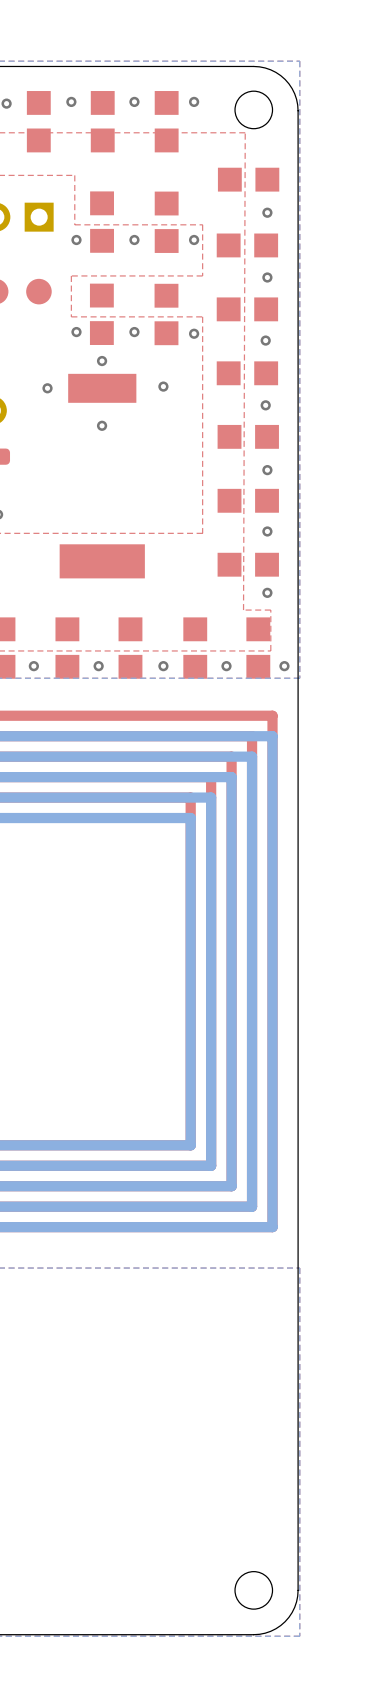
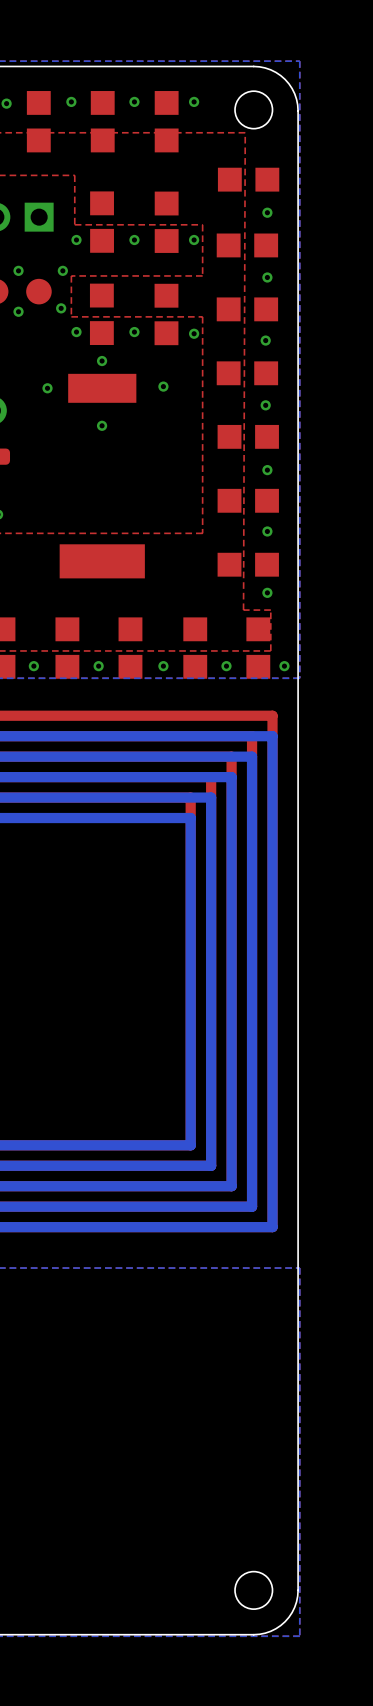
via: none -> (18, 270)
via: none -> (62, 270)
via: none -> (61, 308)
via: none -> (18, 311)

